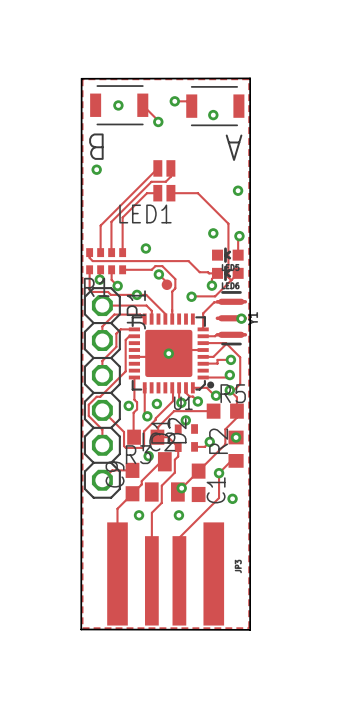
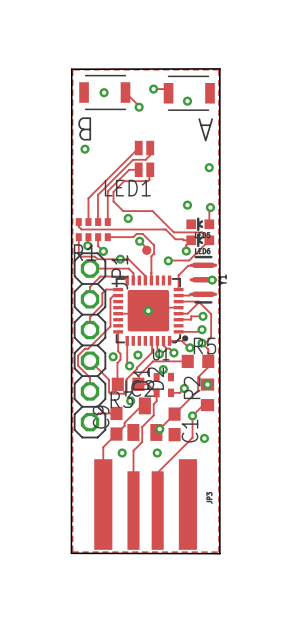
track: (170, 193) (197, 193) (228, 223) (228, 277) (231, 280) -> (150, 169) (148, 181) (124, 181) (113, 191) (113, 201) (123, 211) (152, 211) (173, 232) (202, 232) (209, 240)

